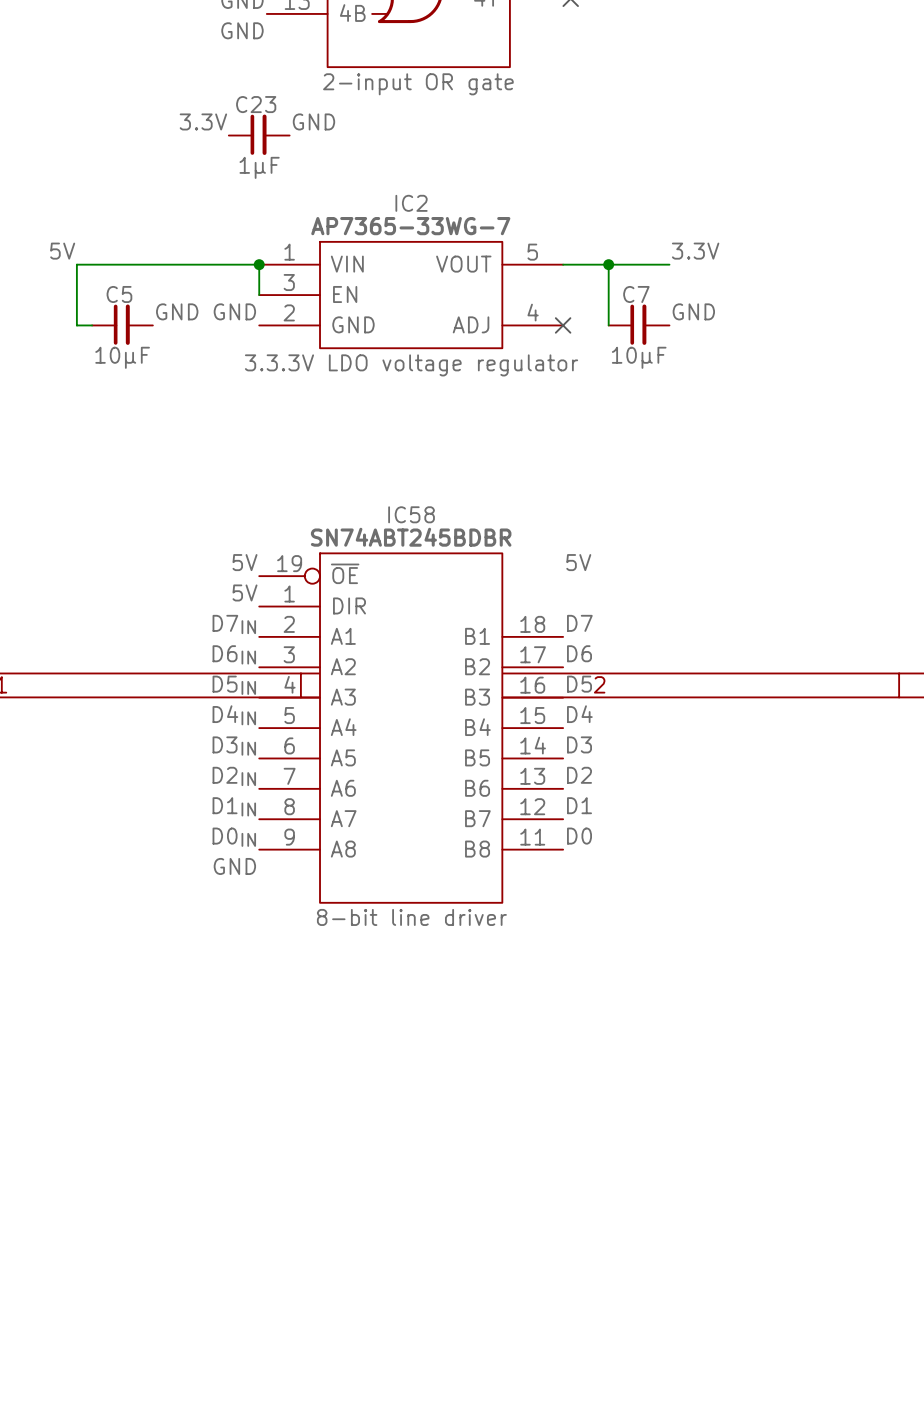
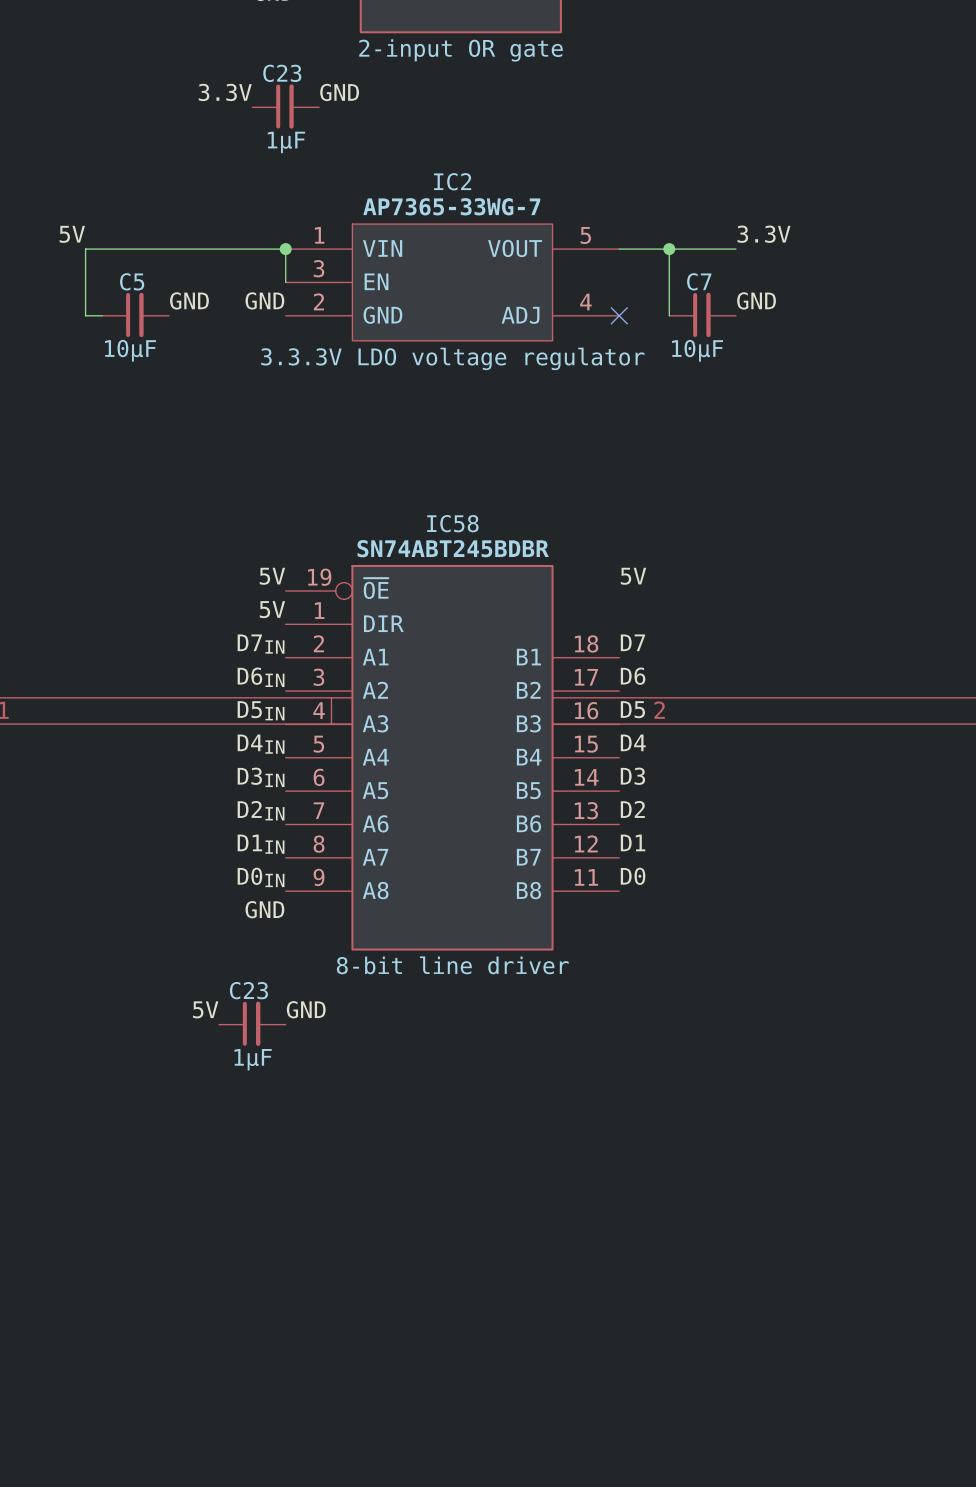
label: none -> 5V (205, 1009)
label: none -> GND (306, 1009)
C23: none -> 1μF (252, 1023)

